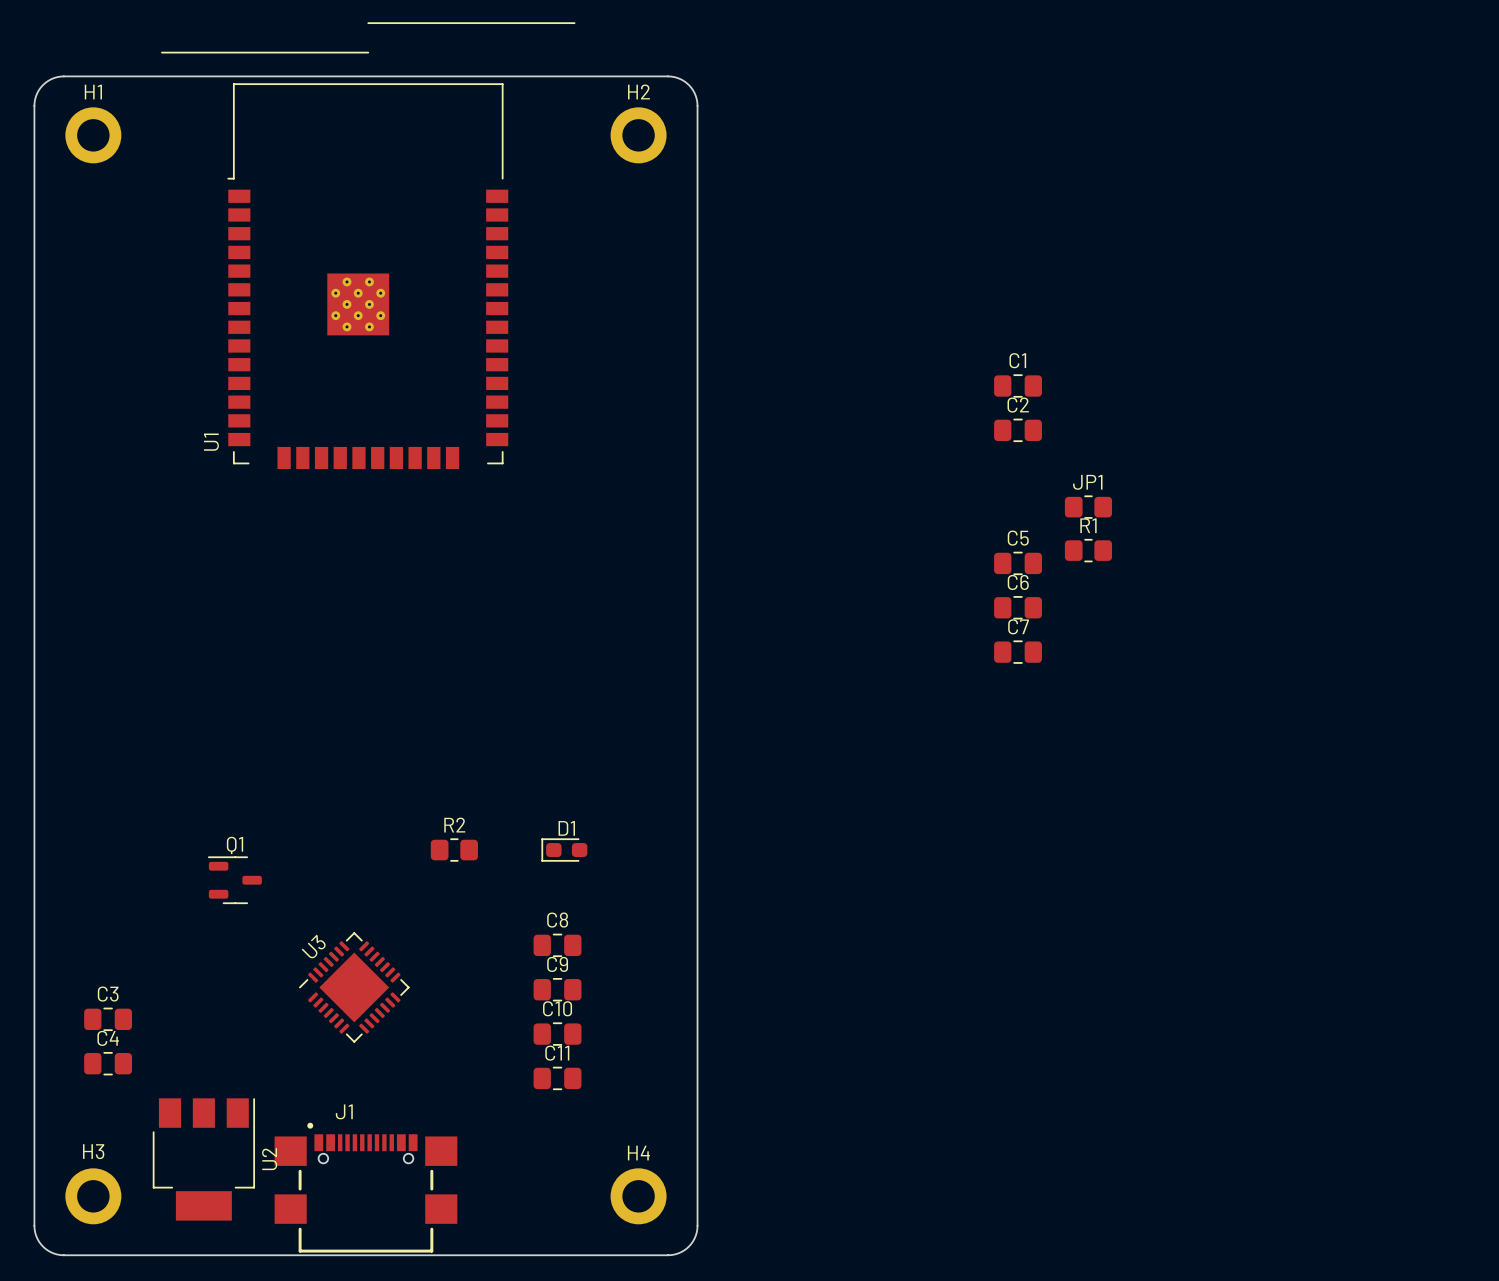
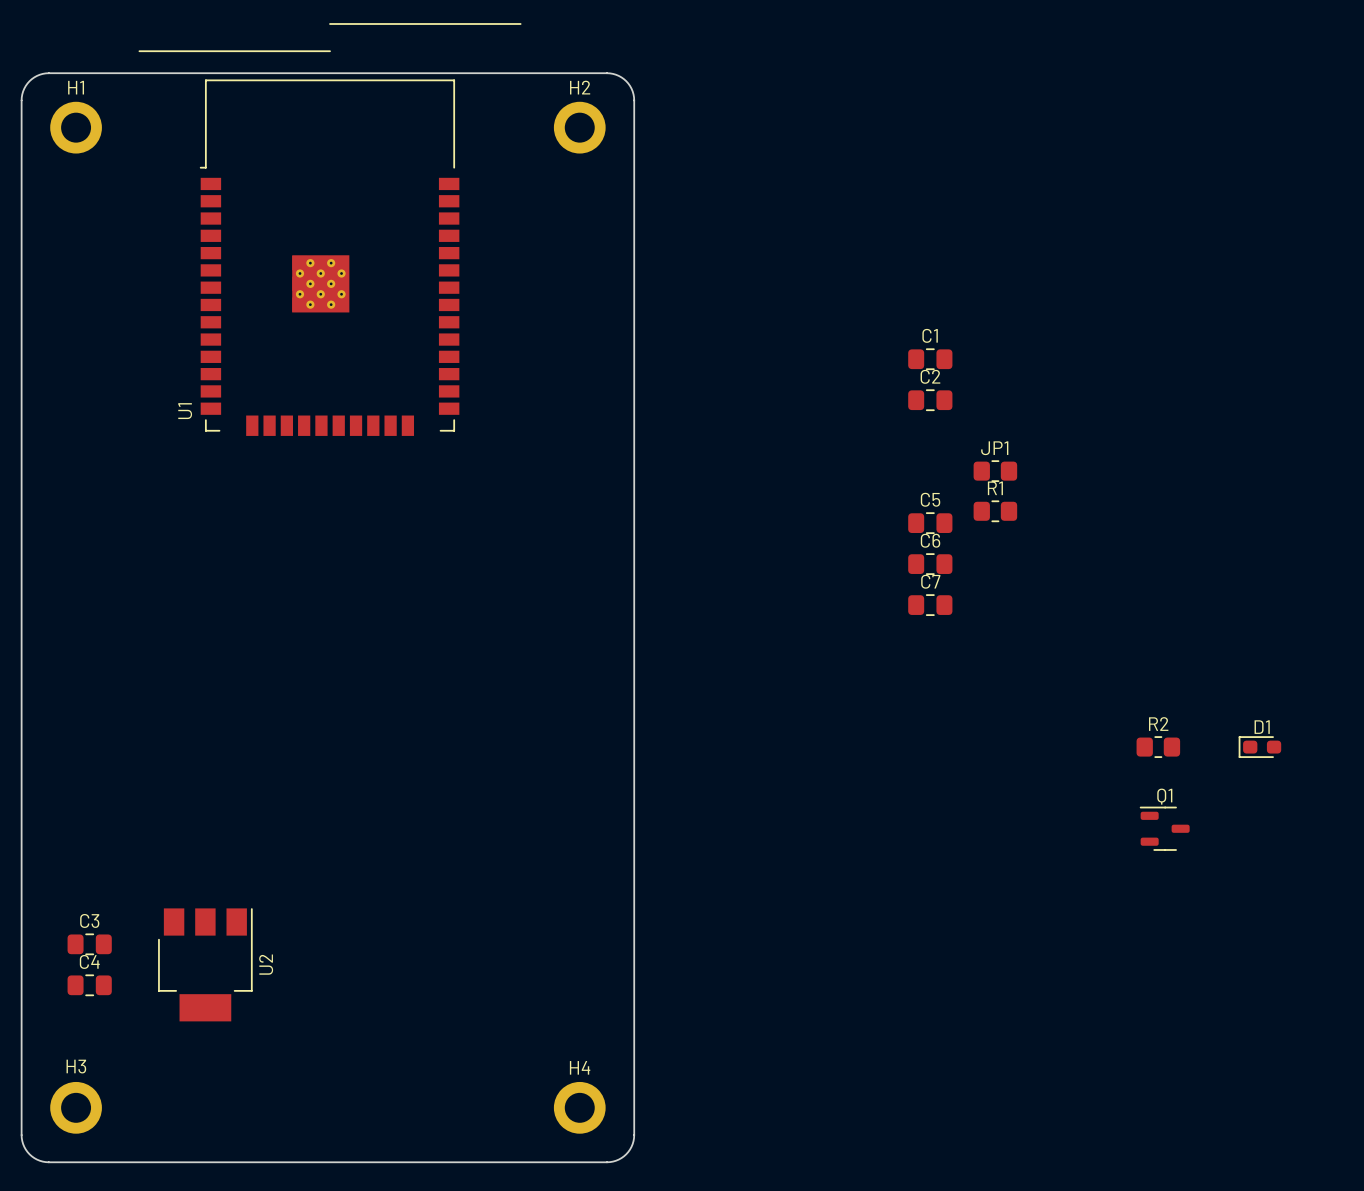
R2 position: (454, 850) -> (1158, 747)
D1 position: (564, 850) -> (1259, 747)
Q1 position: (234, 880) -> (1164, 828)
C8: (557, 945) -> none
U3: (354, 987) -> none
C9: (557, 989) -> none
C10: (557, 1034) -> none
C11: (557, 1078) -> none
U2 position: (203, 1159) -> (205, 964)
J1: (365, 1187) -> none

